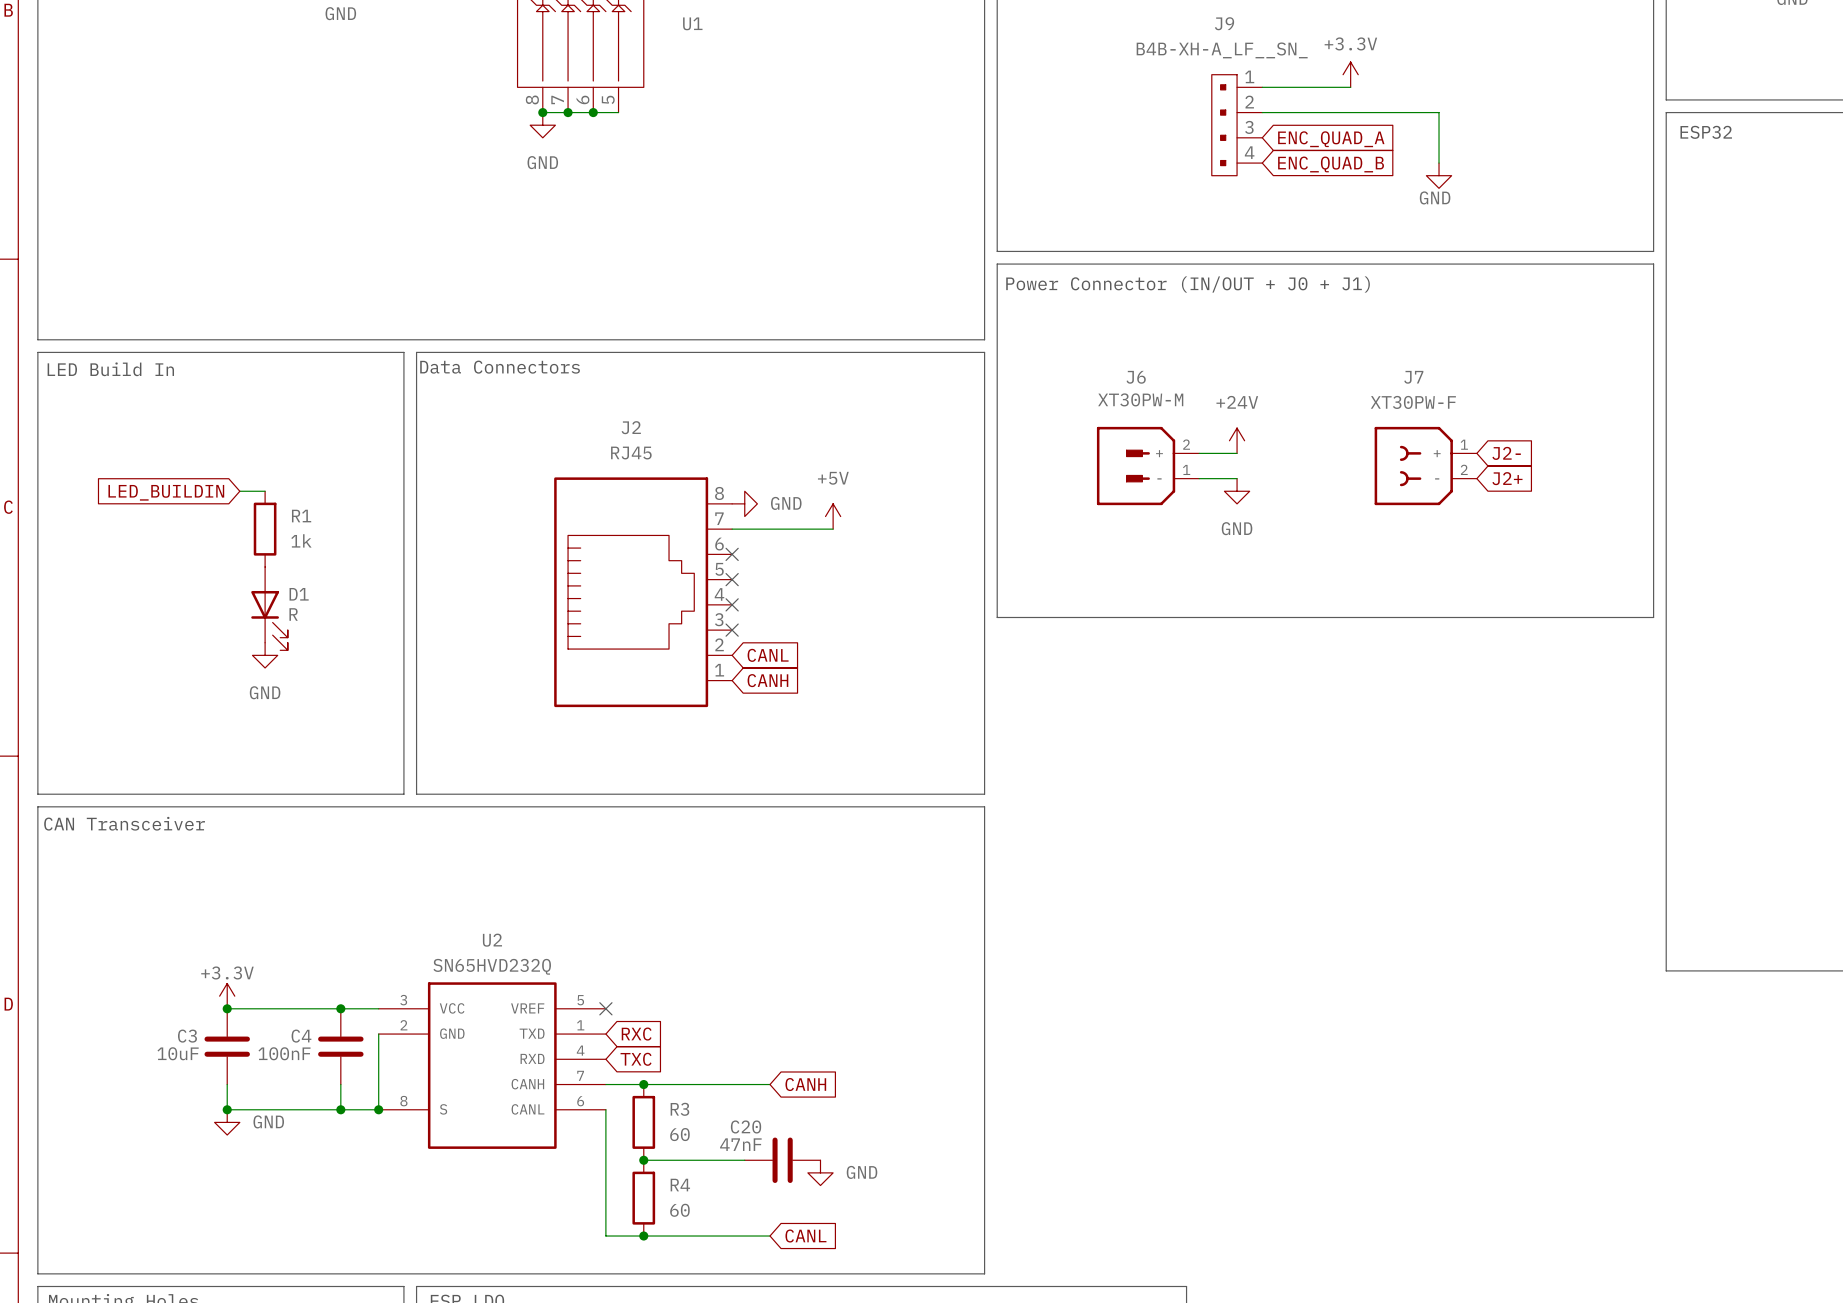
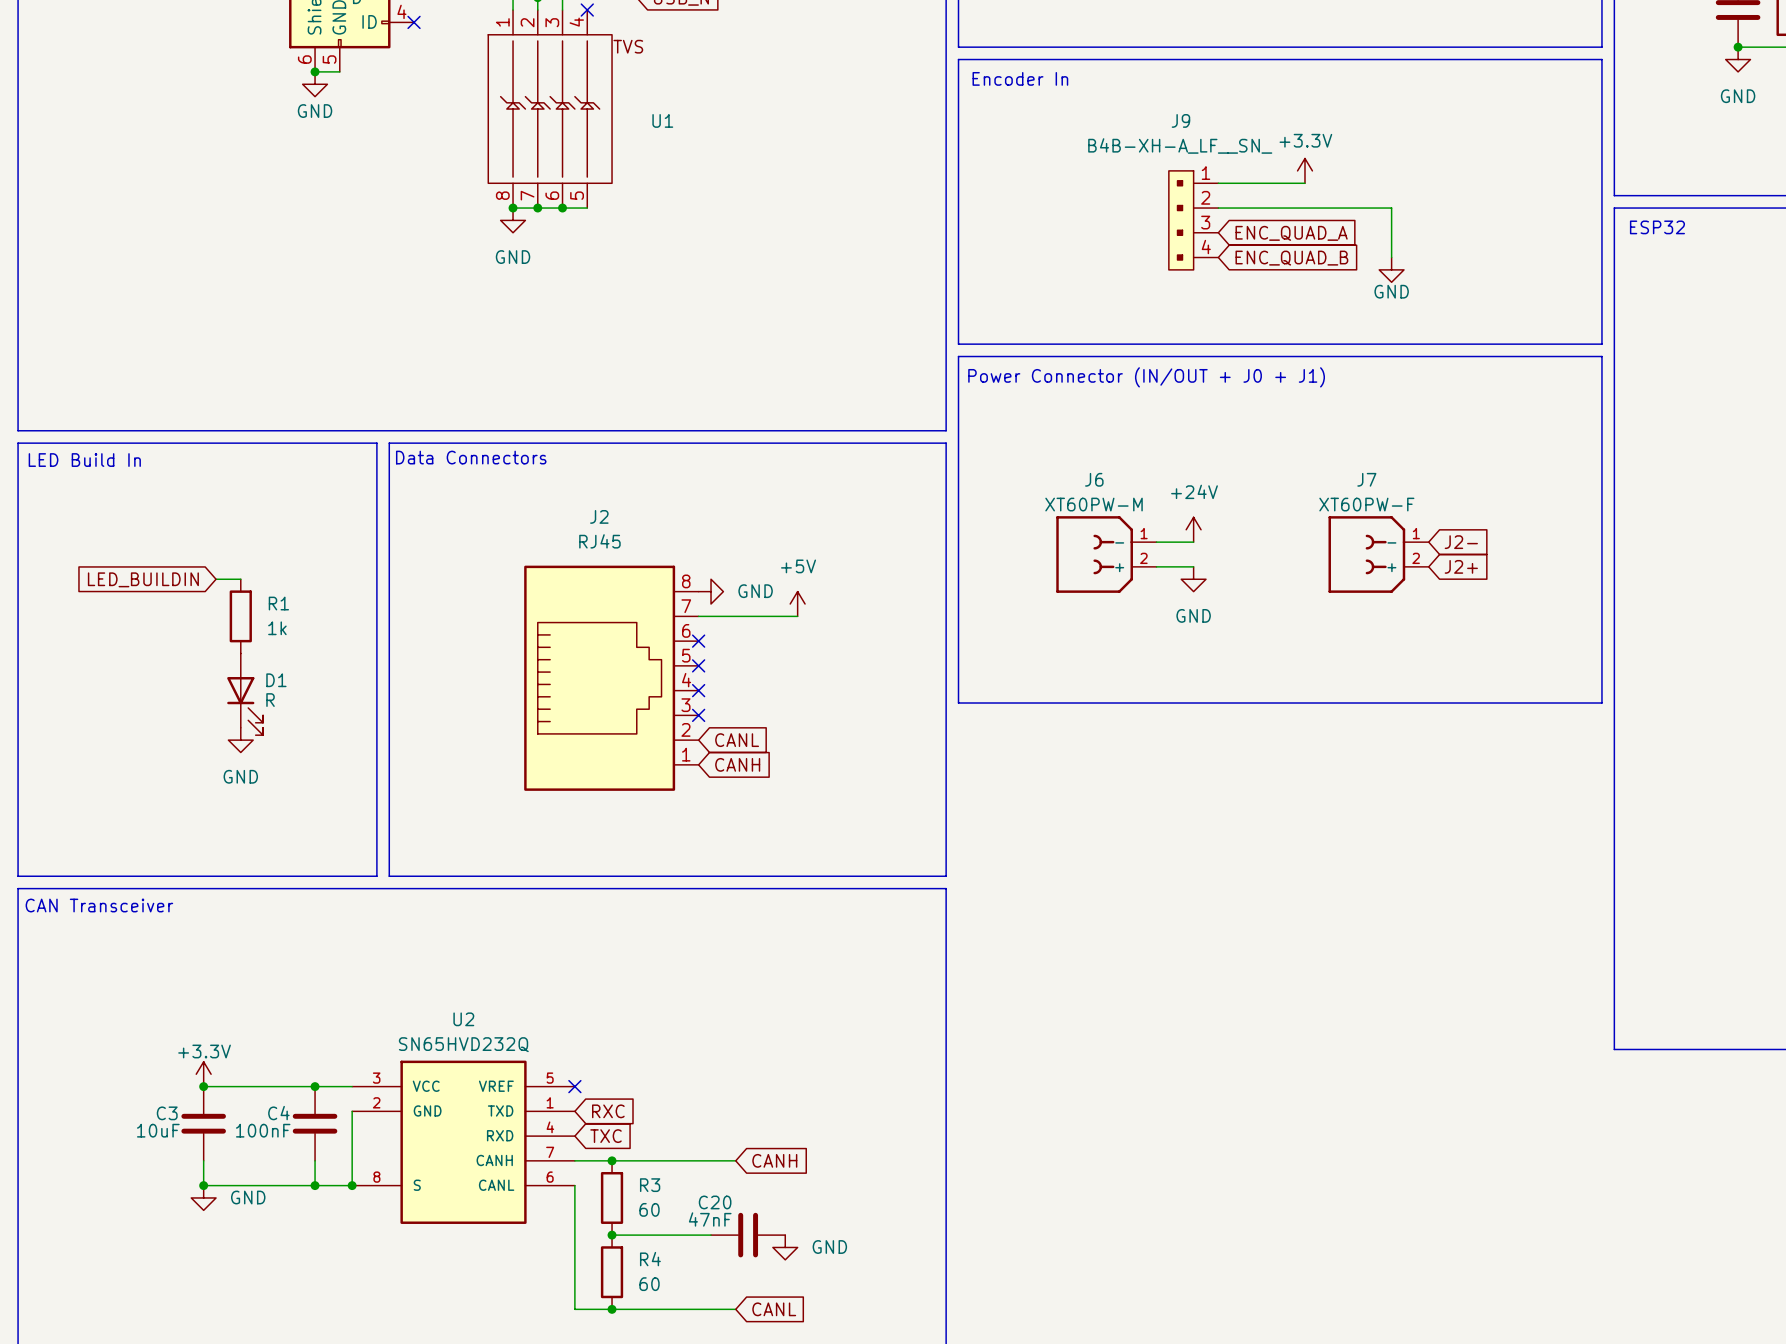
J6 value: XT30PW-M (1140, 399) -> XT60PW-M (1094, 504)
J7 value: XT30PW-F (1413, 402) -> XT60PW-F (1366, 504)
J6 symbol: [1096, 426, 1200, 506] -> [1056, 516, 1157, 593]
J7 symbol: [1374, 426, 1477, 506] -> [1328, 516, 1429, 593]

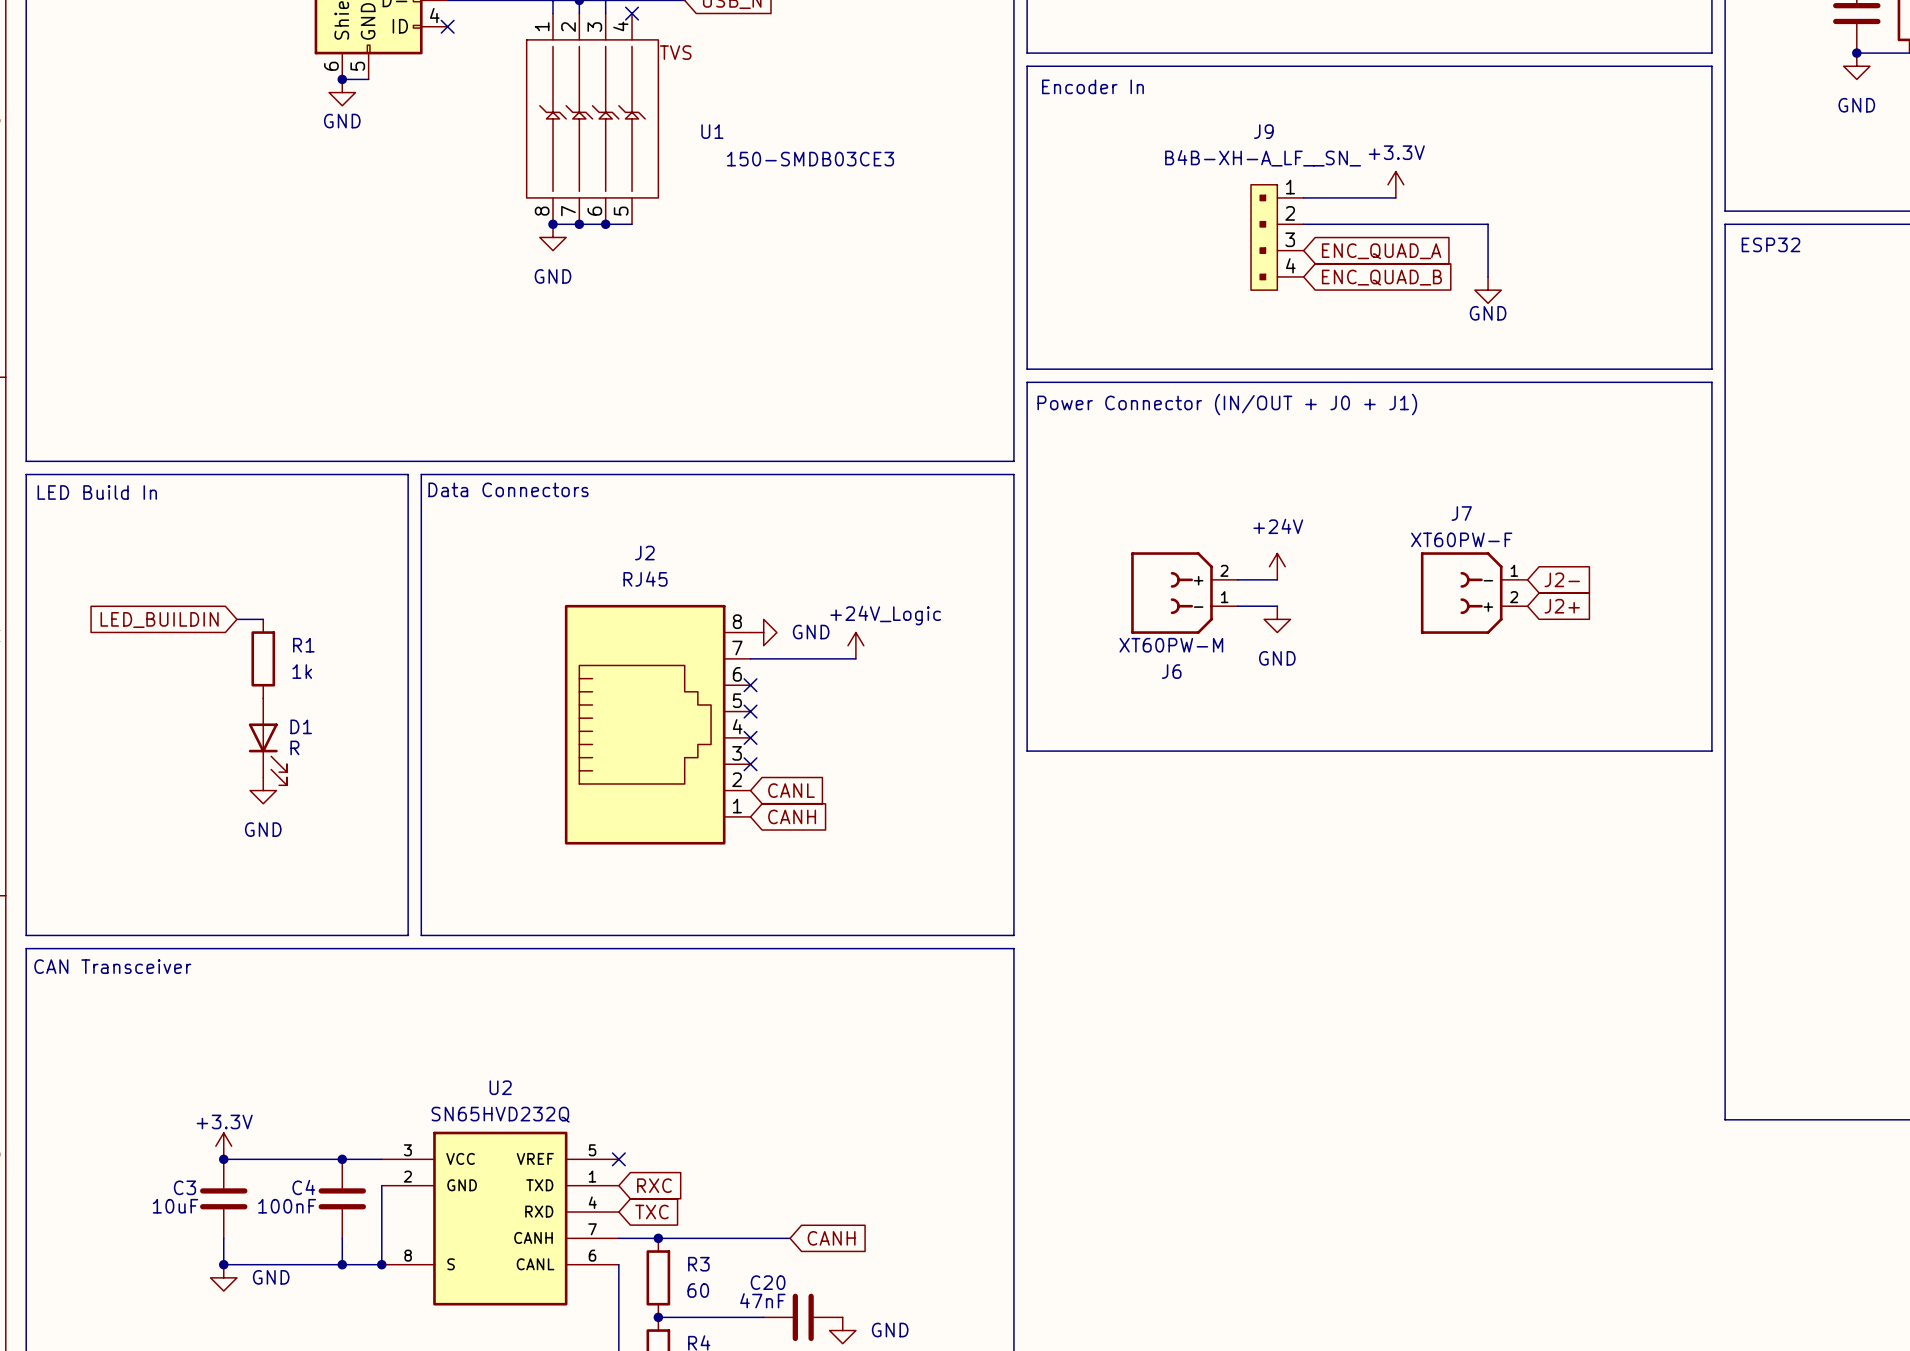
U1 value: none -> 150-SMDB03CE3 (810, 159)
J6 flip: as is (1094, 554) -> up-down (1171, 593)
power symbol: +5V (797, 604) -> +24V_Logic (855, 645)

